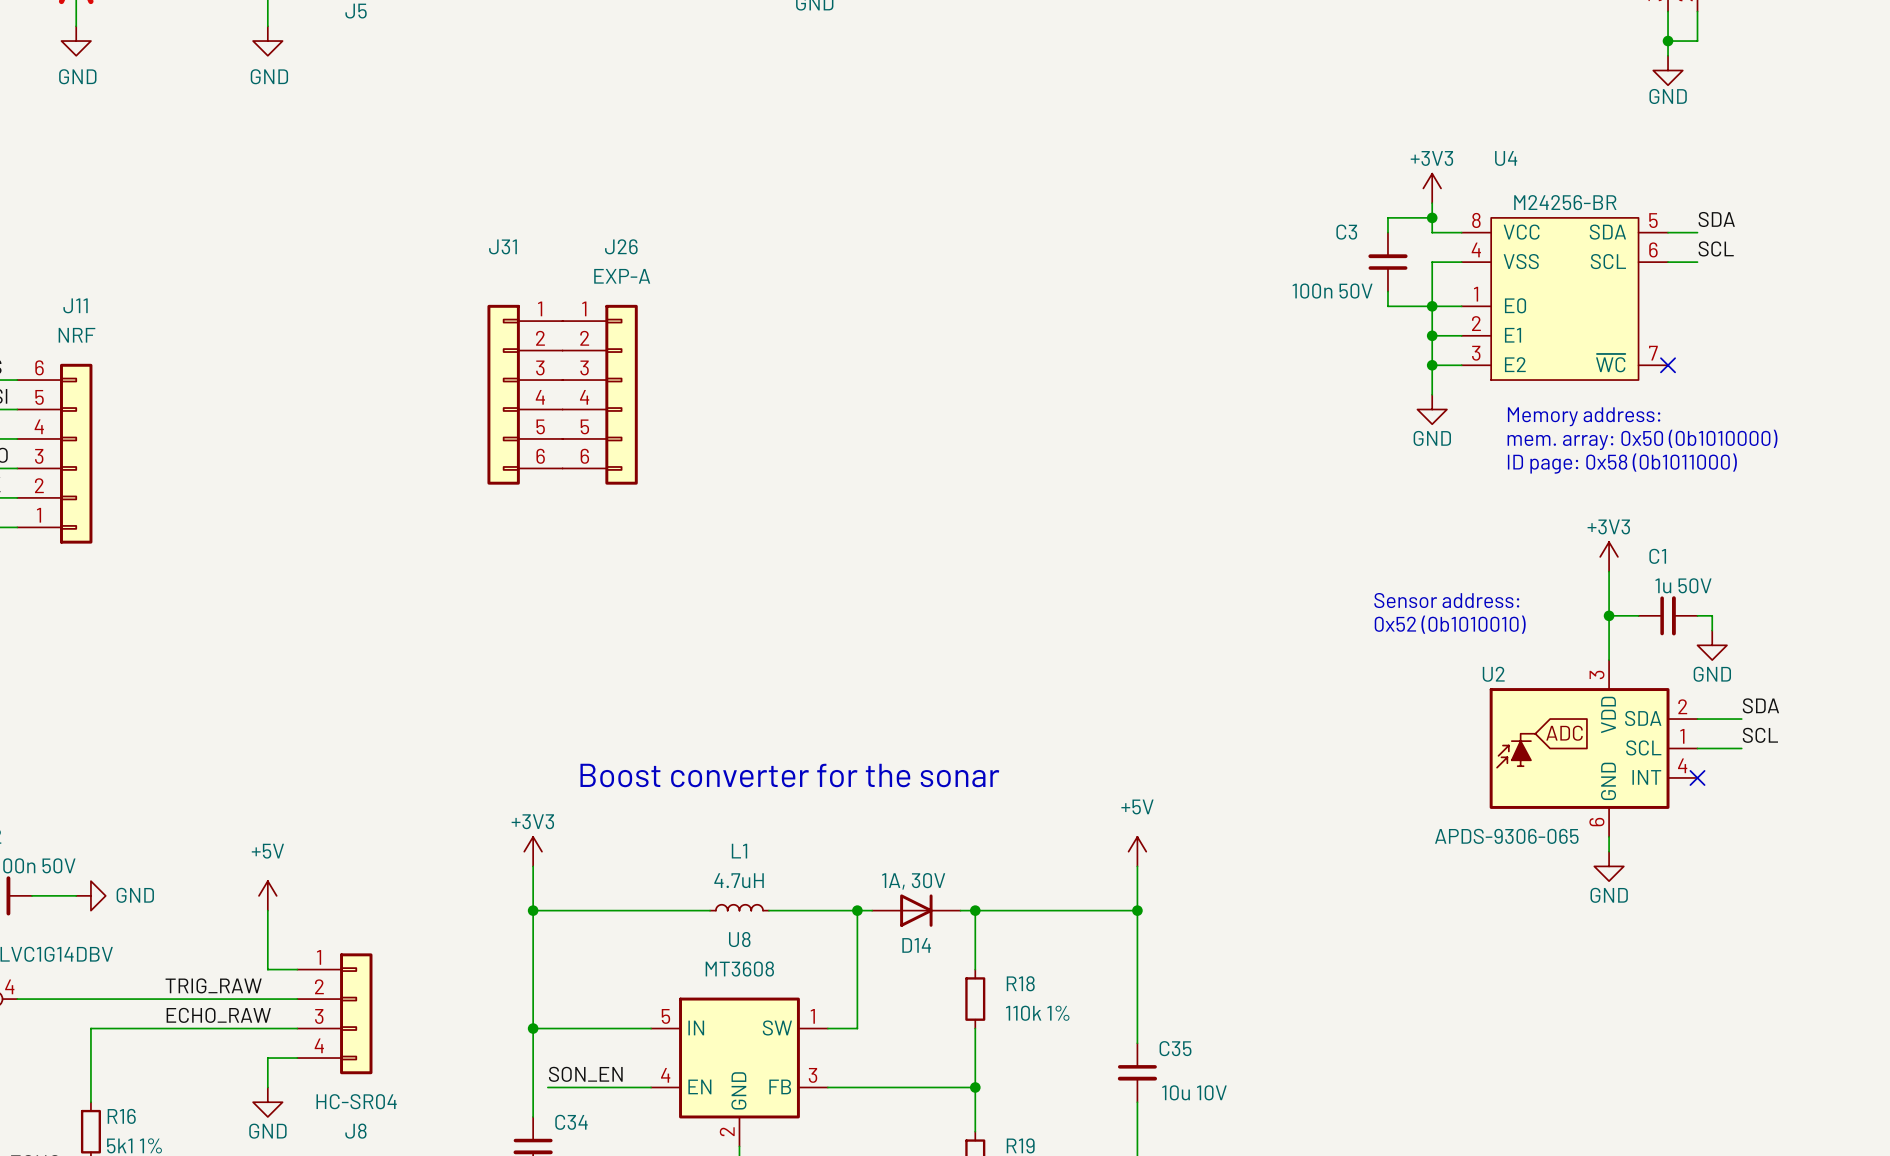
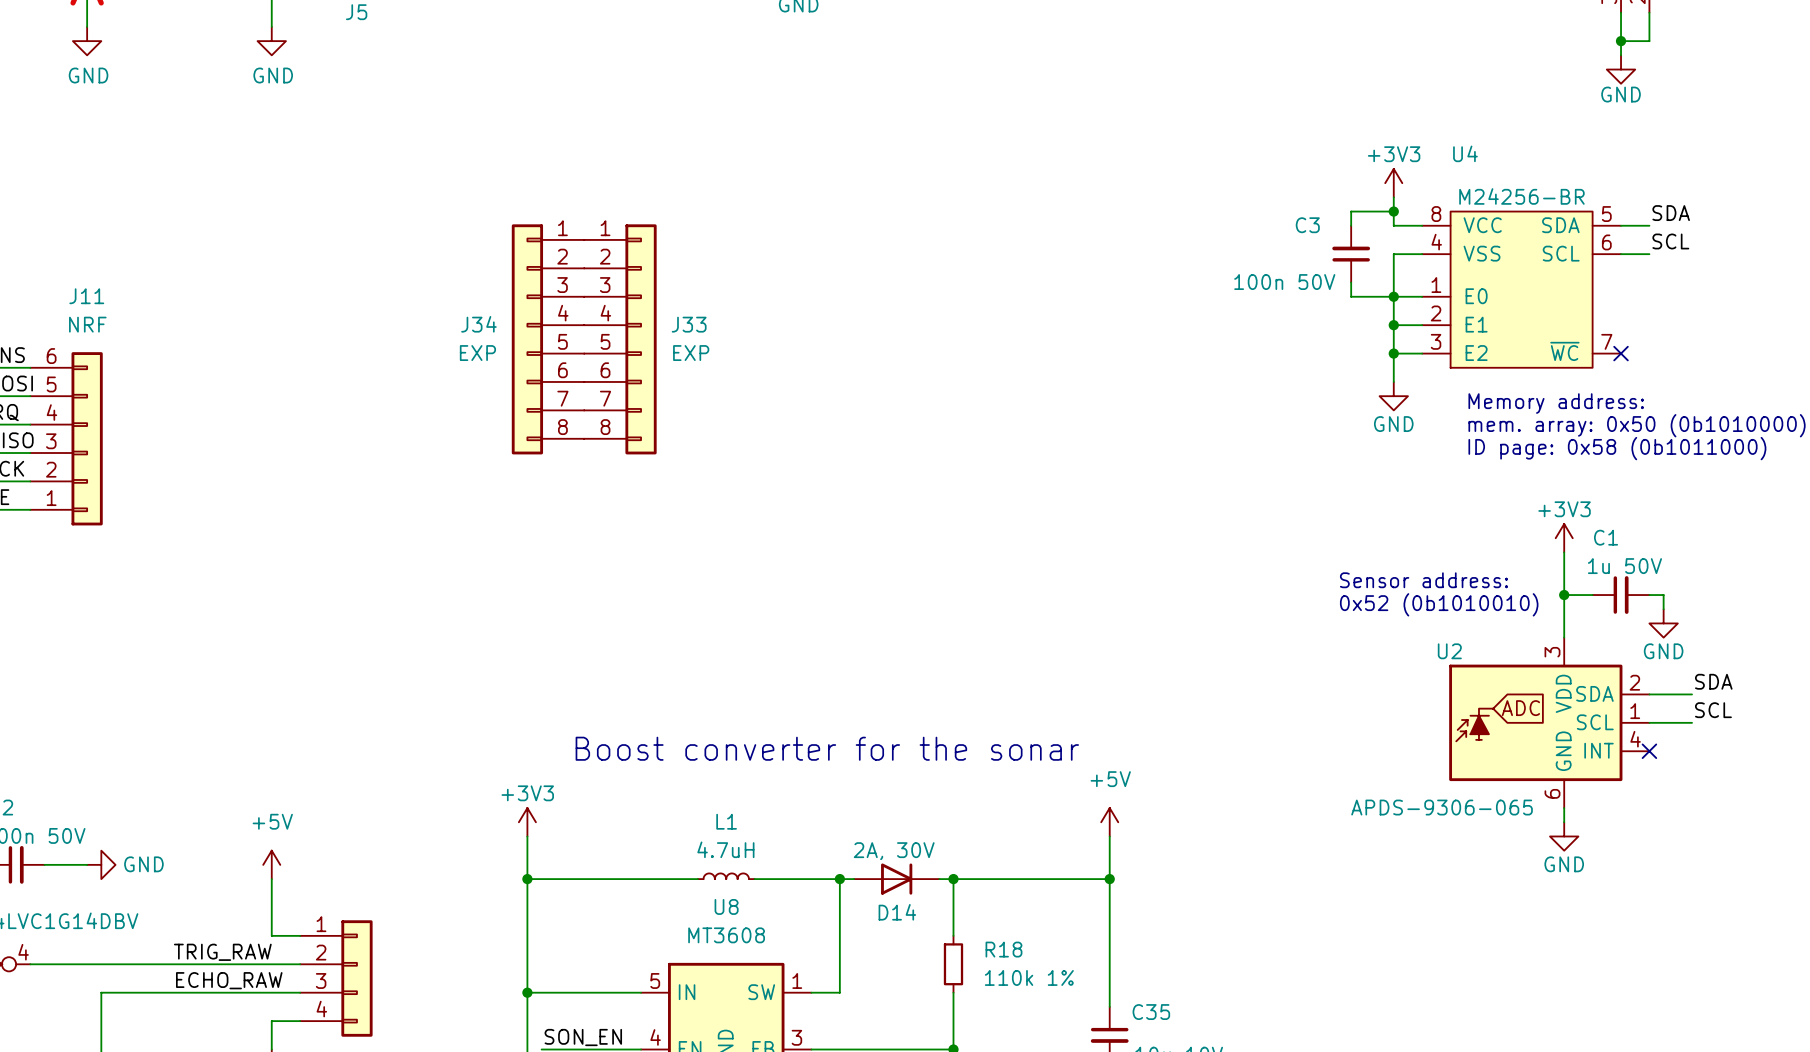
J34: none -> EXP (548, 339)
J33: none -> EXP (620, 339)
J31: (525, 394) -> none
J26: EXP-A (600, 394) -> none
D14 value: 1A, 30V (913, 881) -> 2A, 30V (894, 851)

